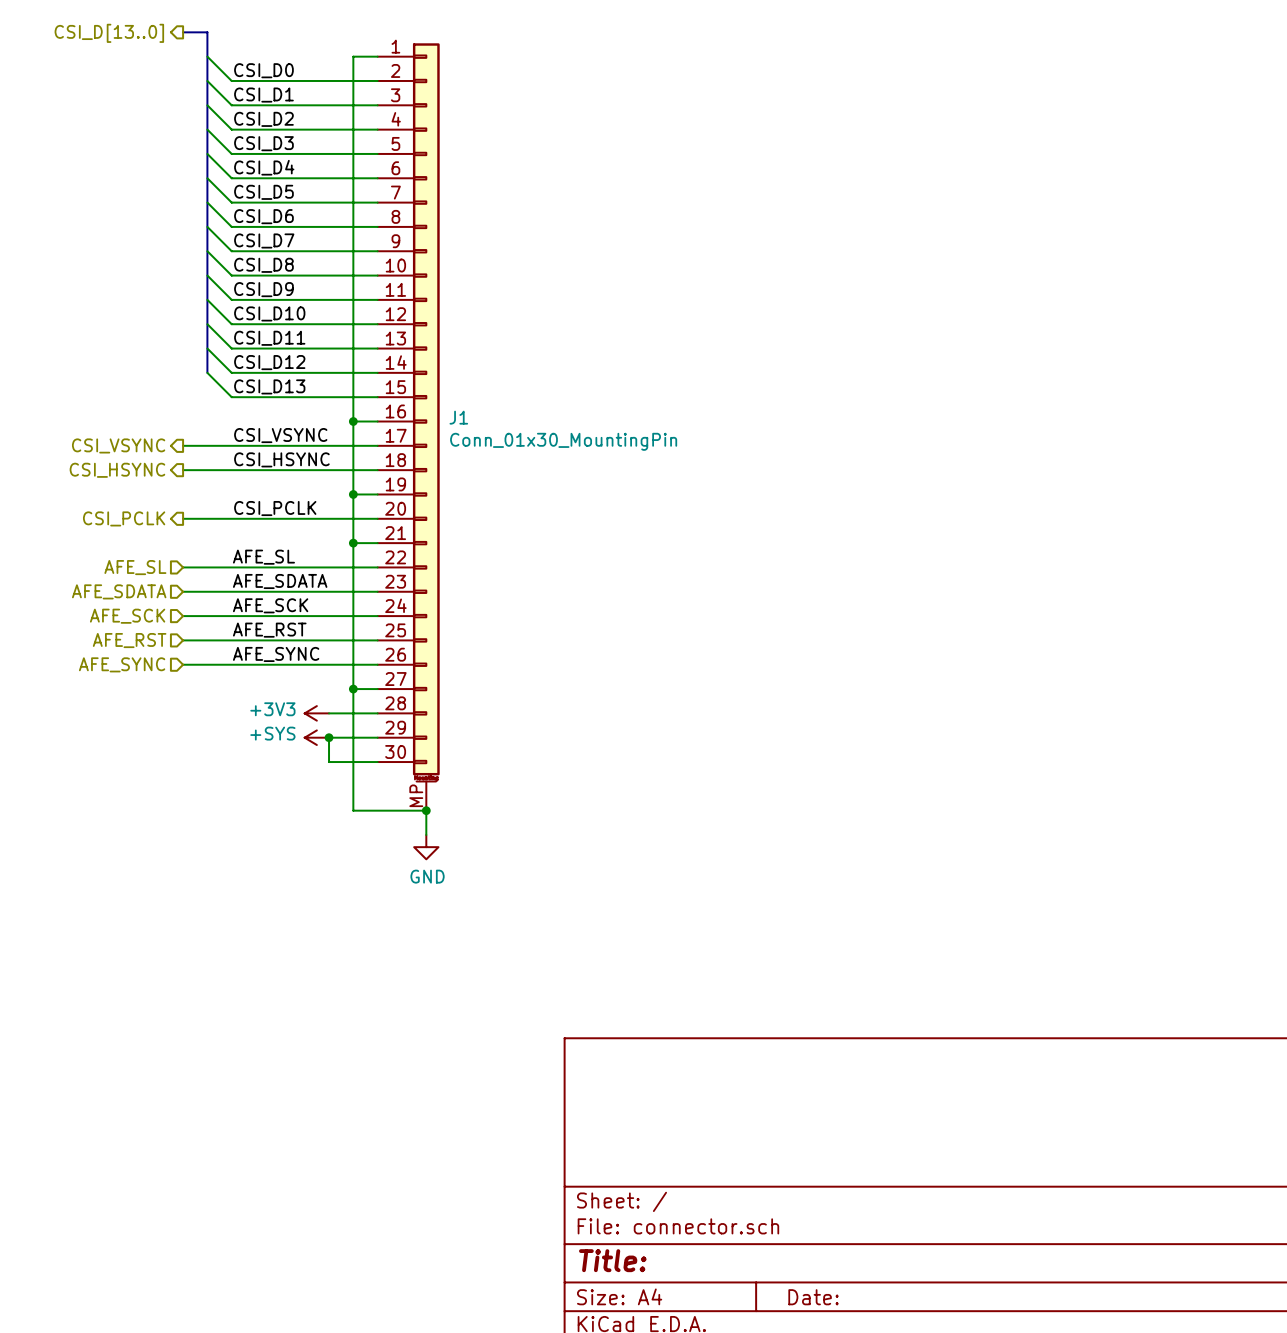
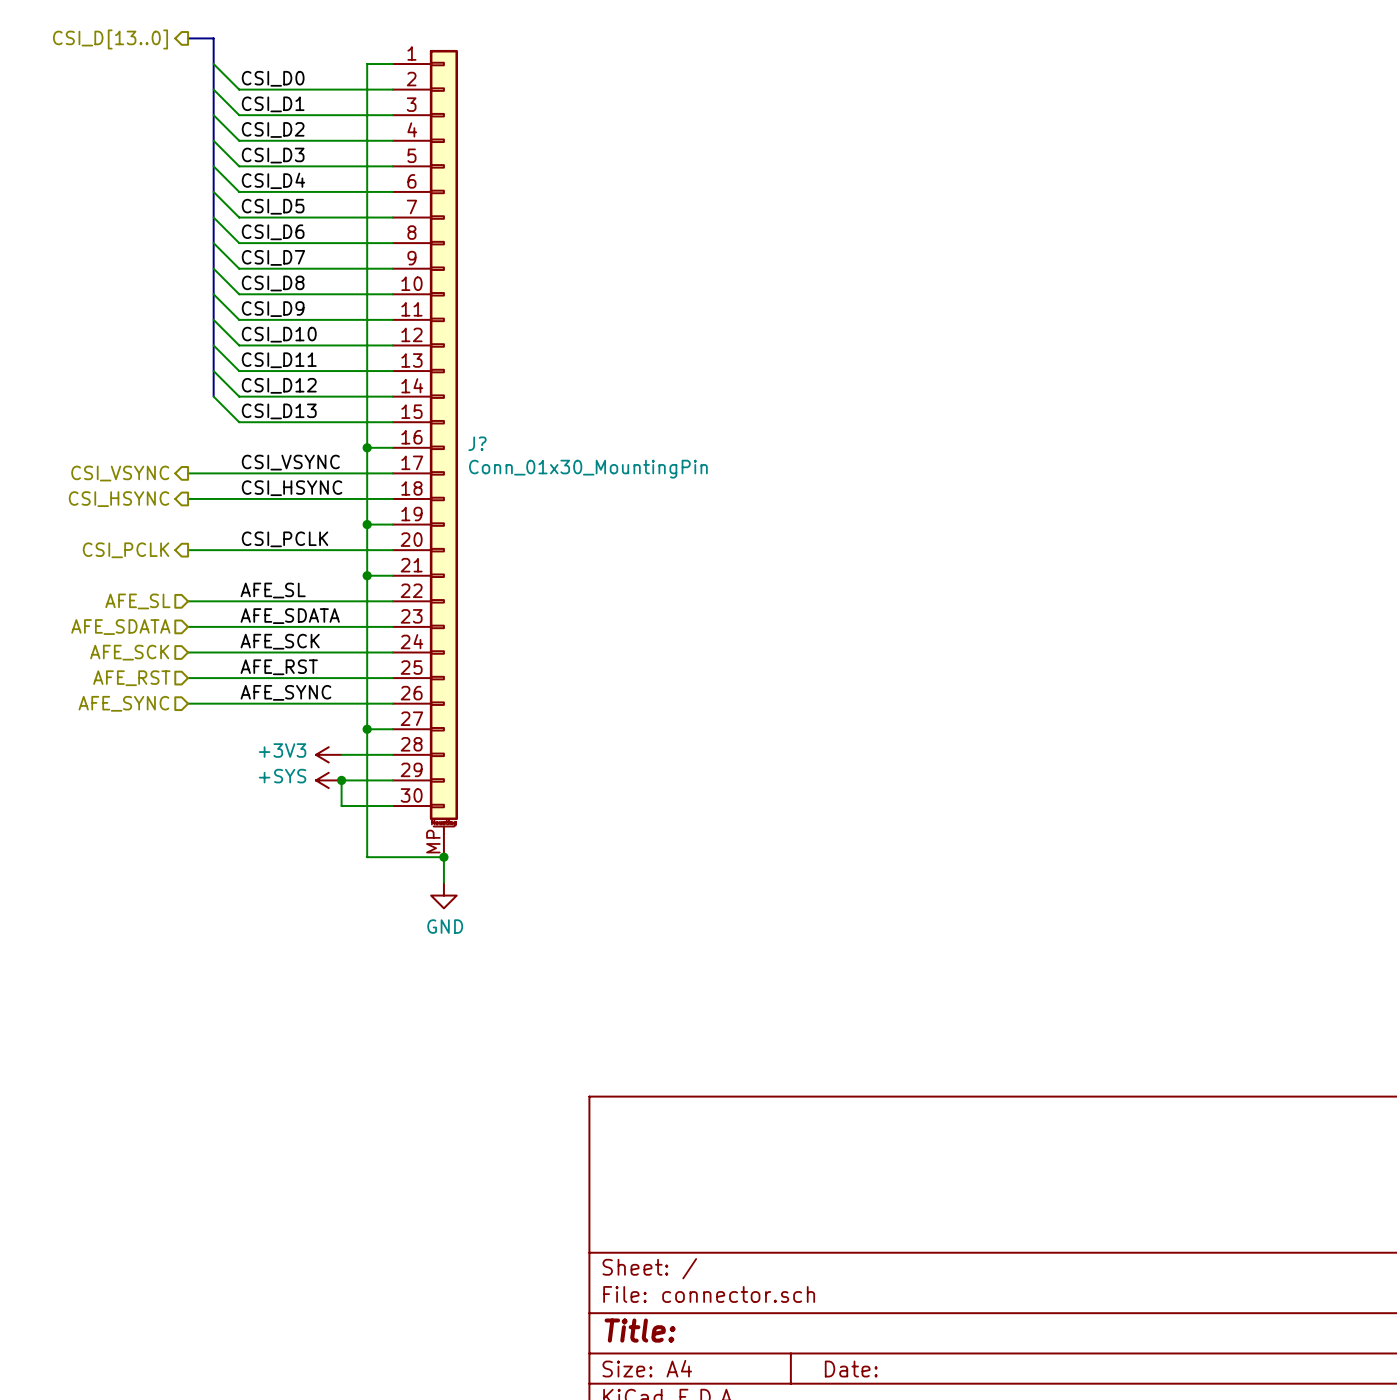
J1 name: J1 (458, 417) -> J? (477, 443)

